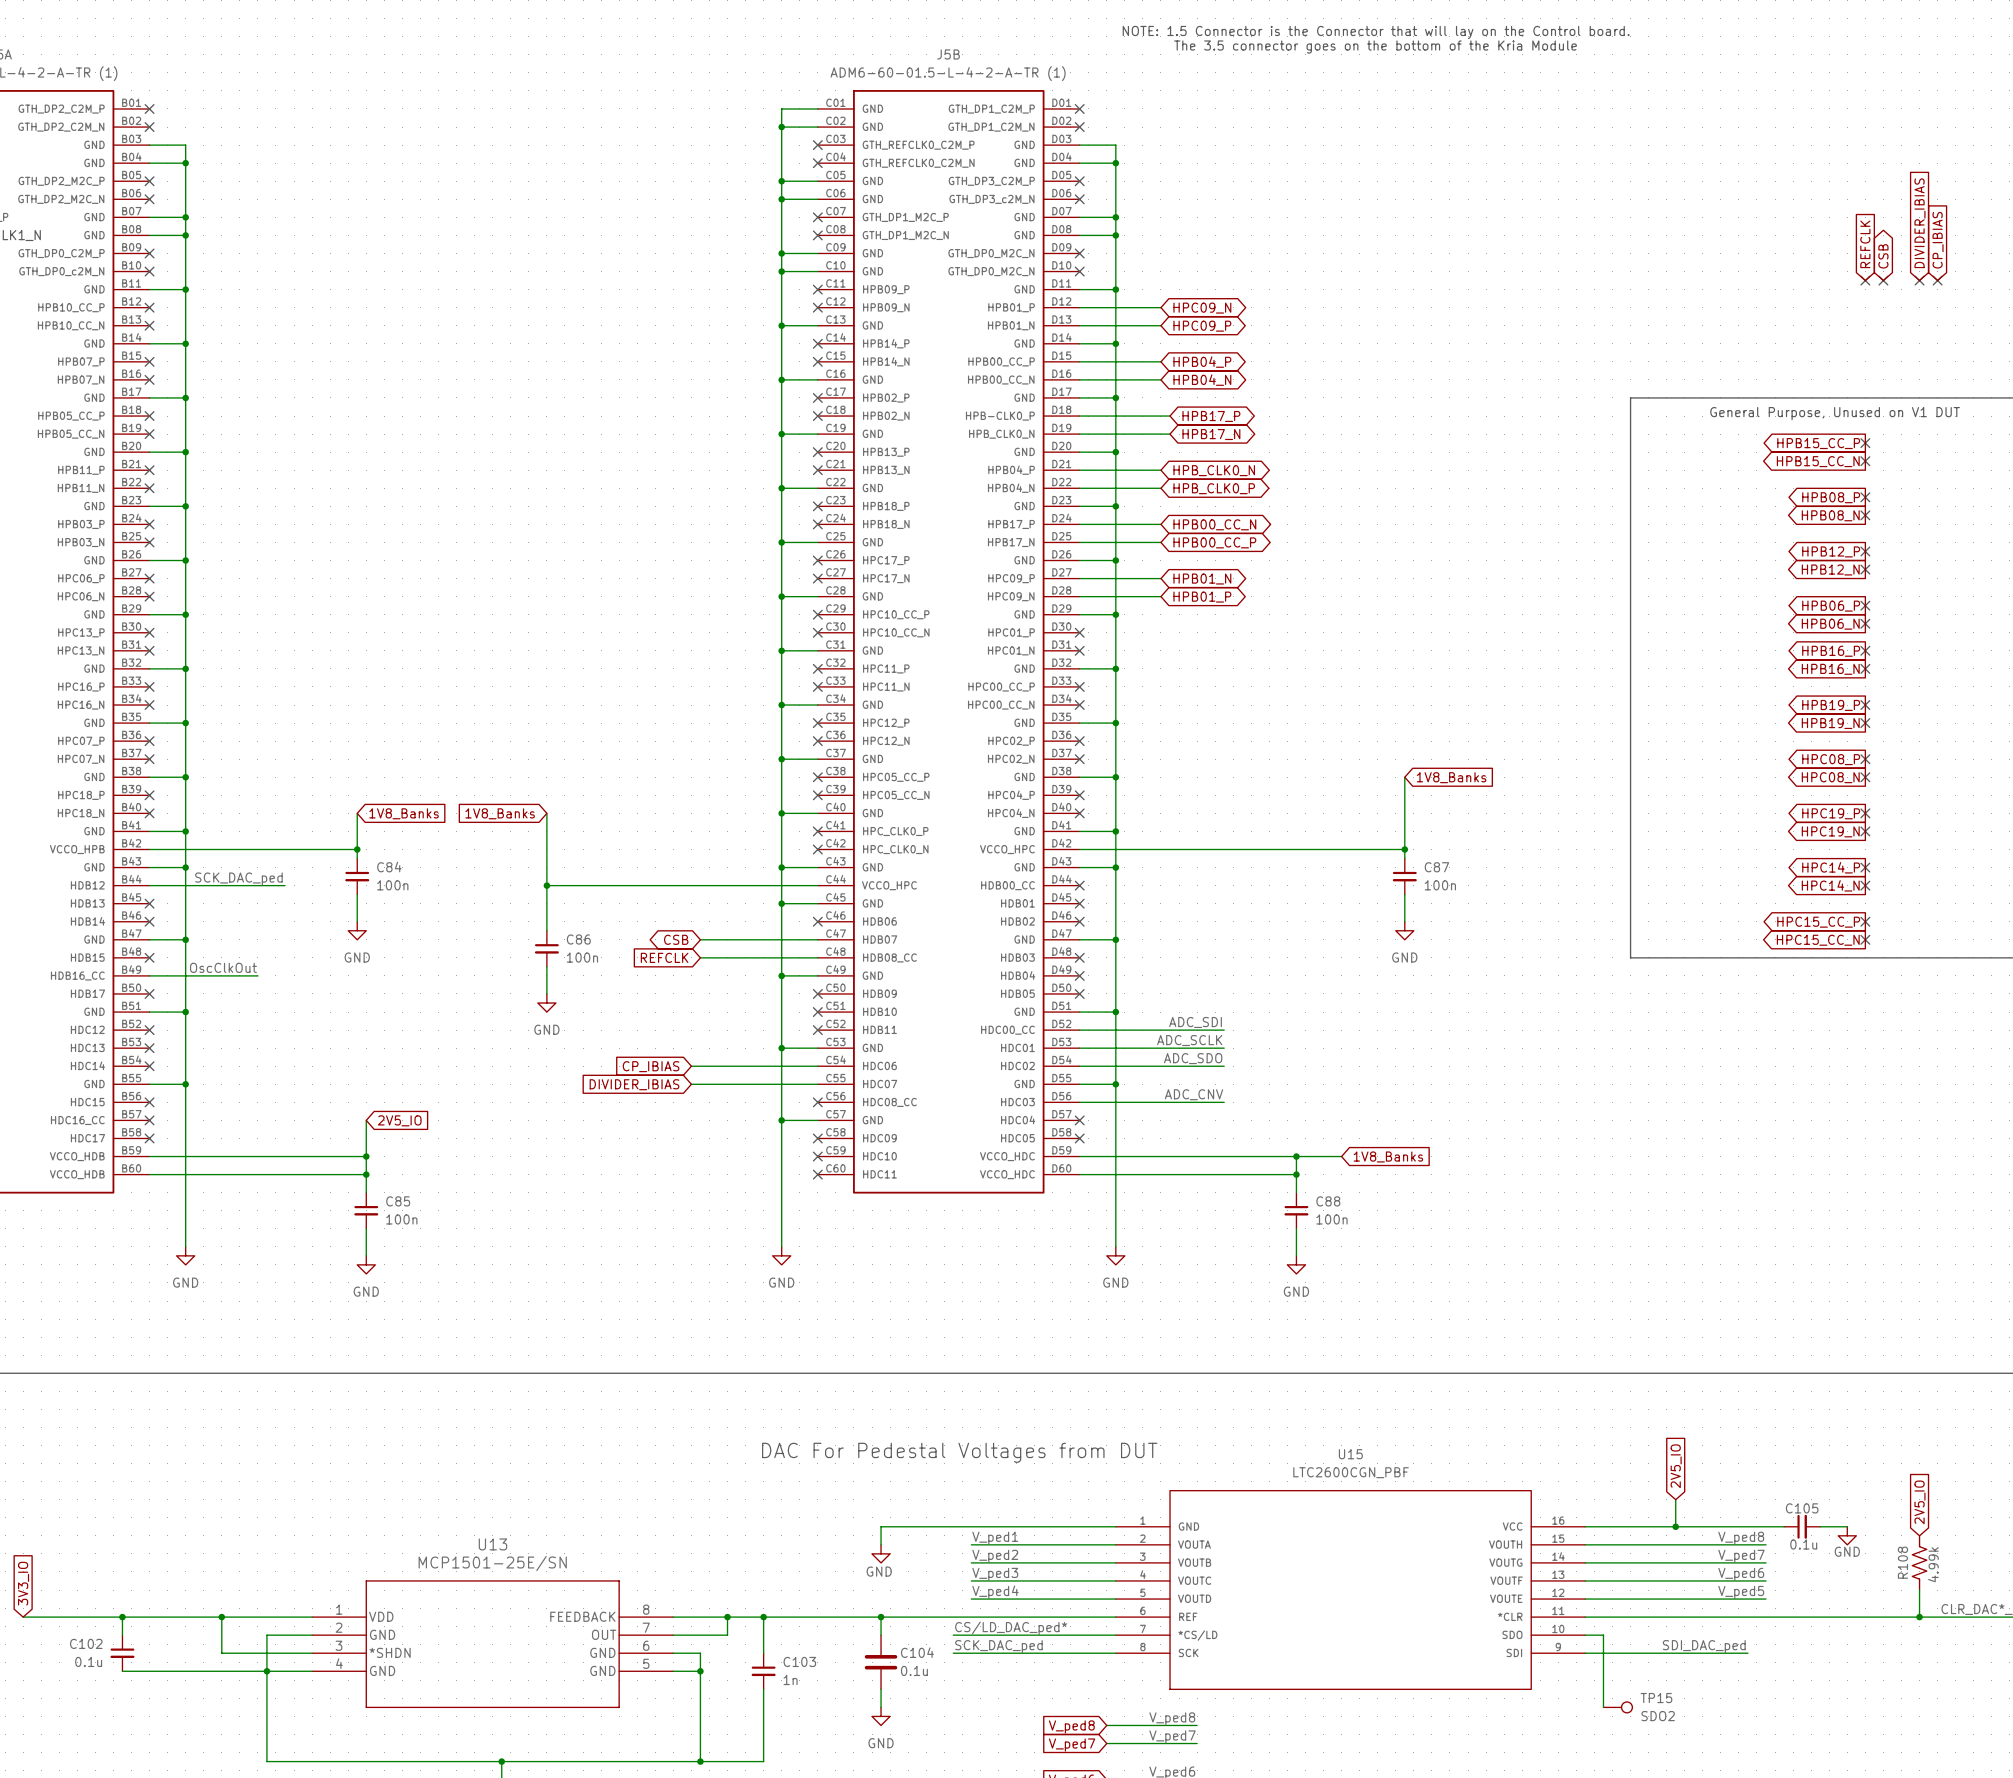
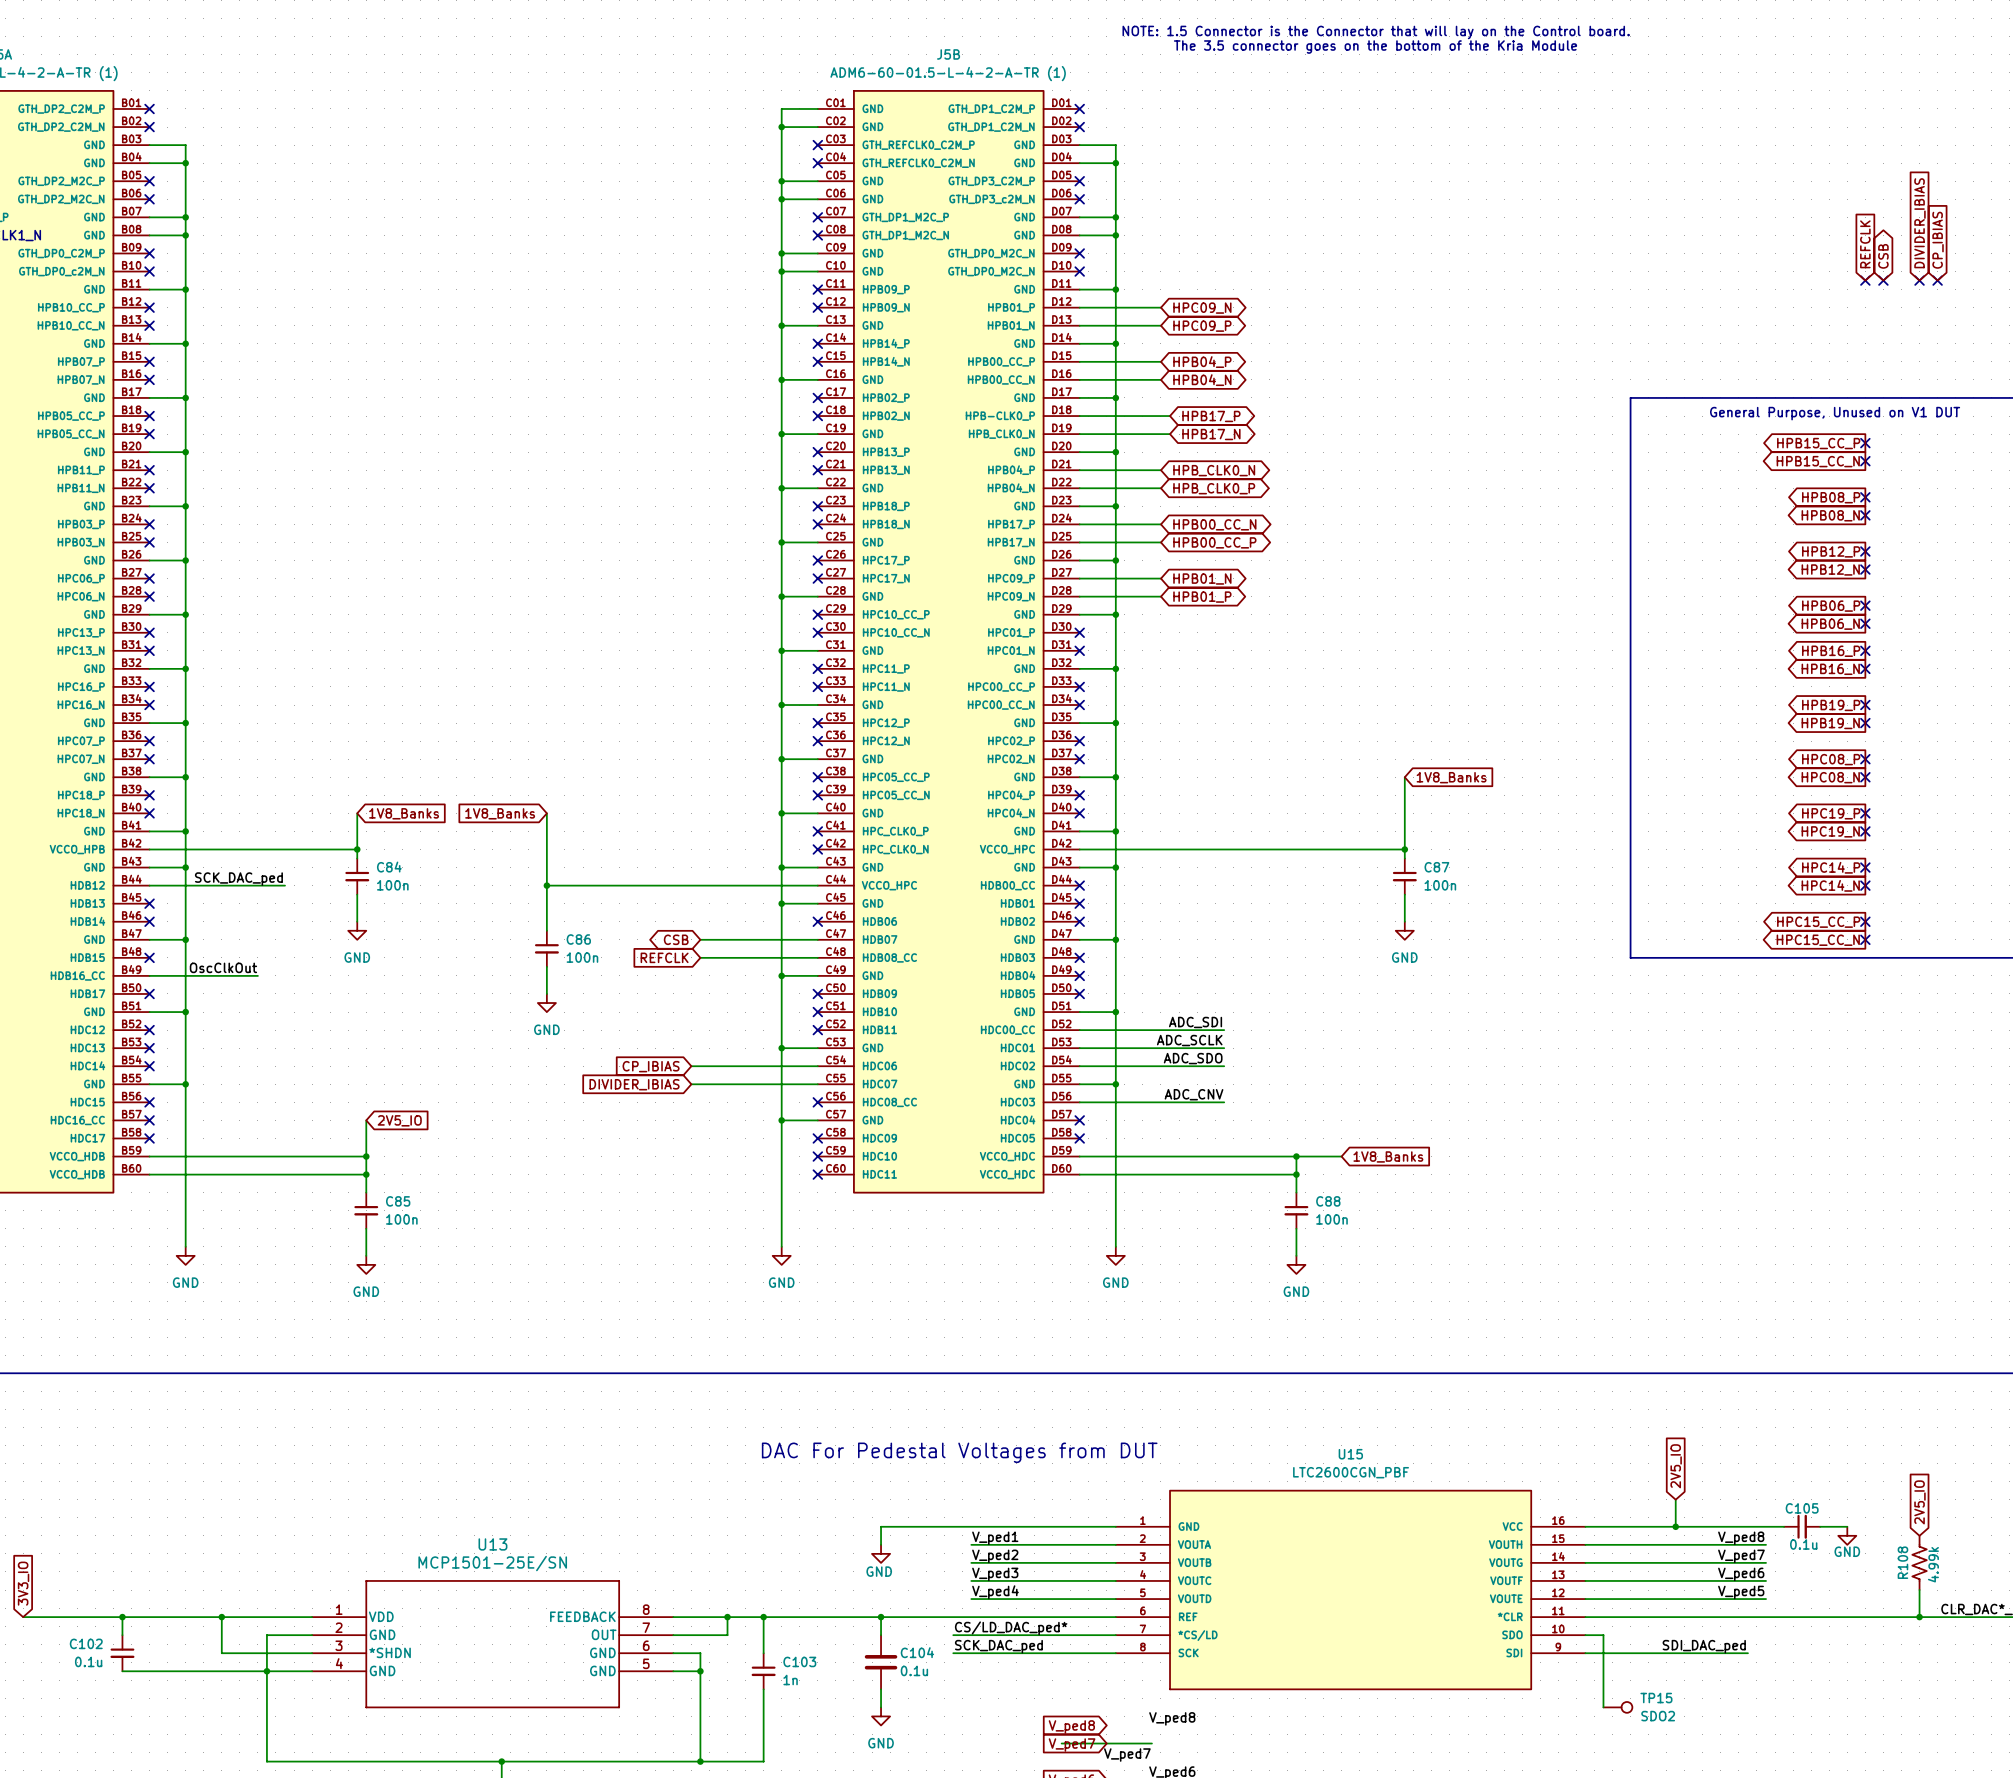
wire: (1106, 1725) (1197, 1725) -> none
label position: V_ped7 (1172, 1736) -> V_ped7 (1127, 1755)
wire: (1151, 1743) (1197, 1743) -> (1061, 1743) (1106, 1743)

